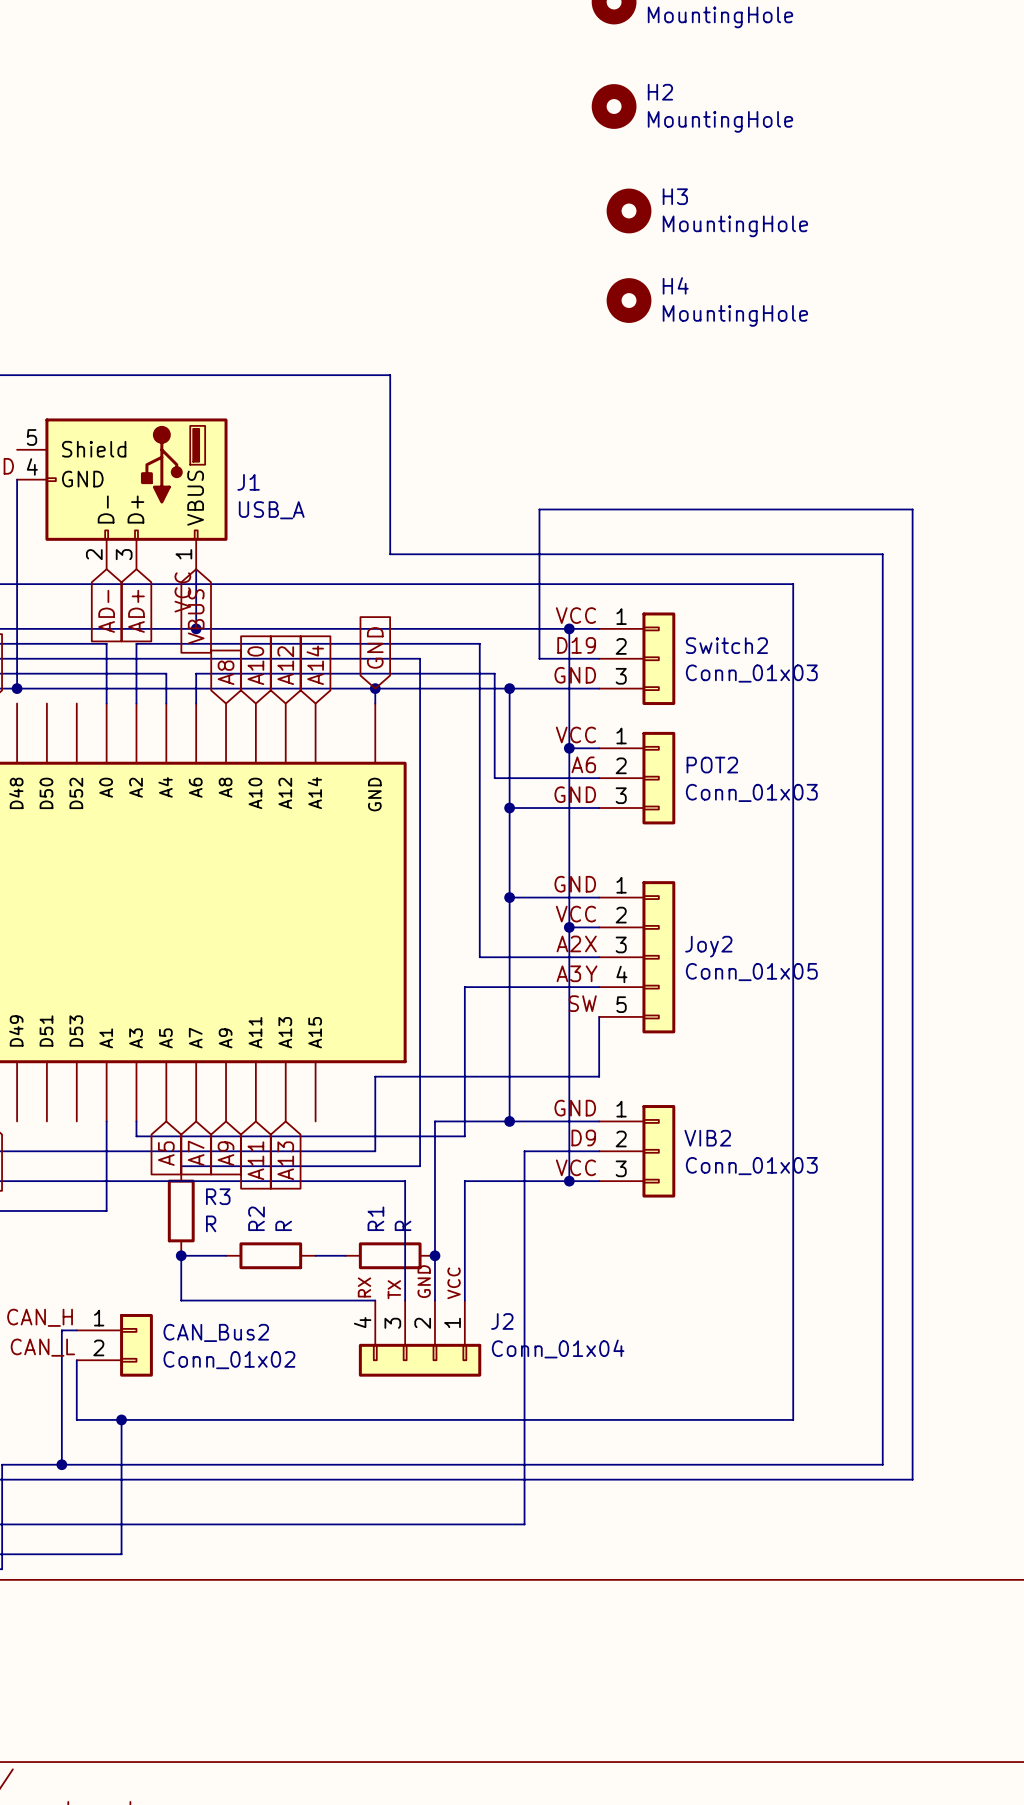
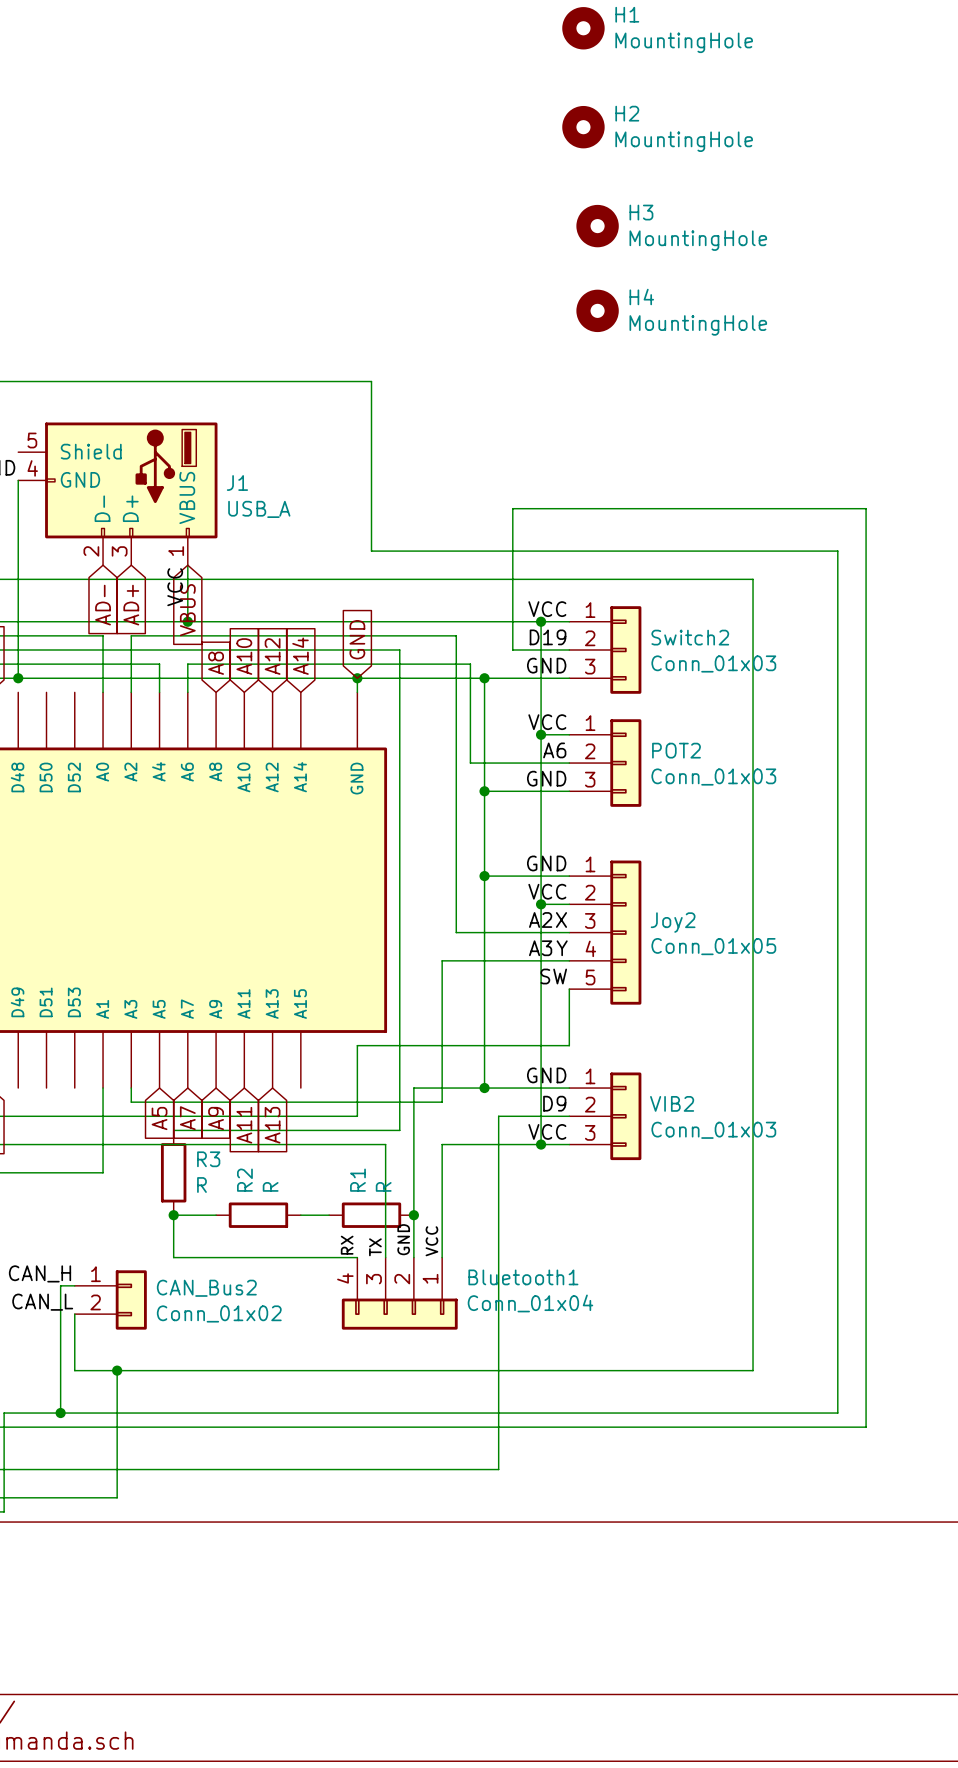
J2 name: J2 (502, 1321) -> Bluetooth1 (523, 1277)

